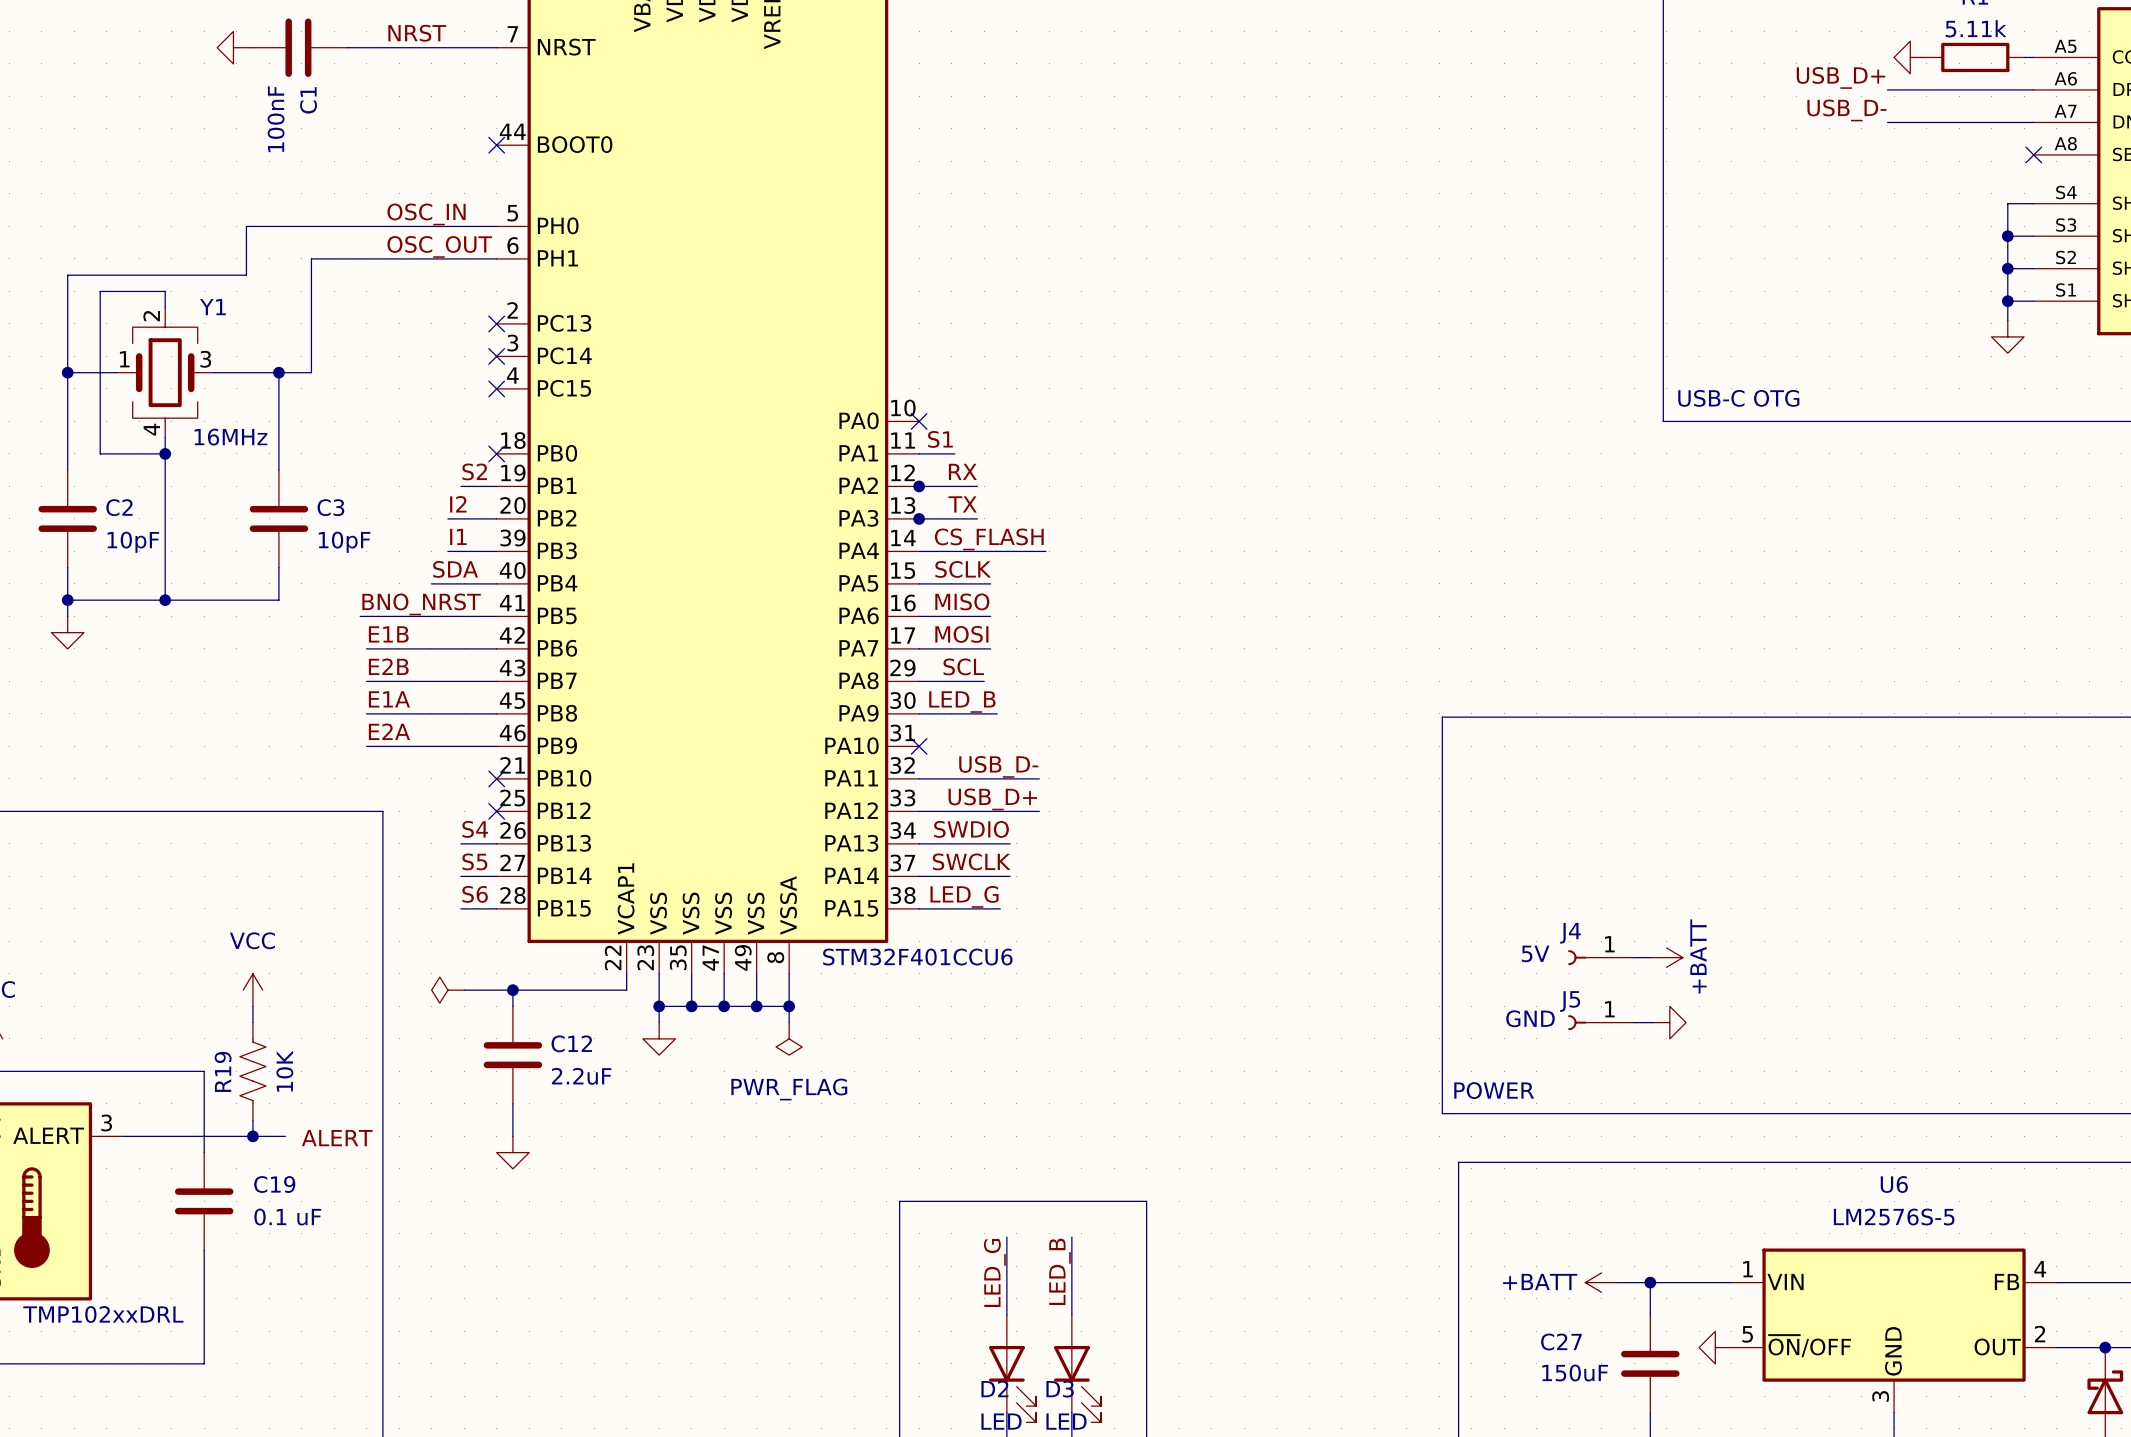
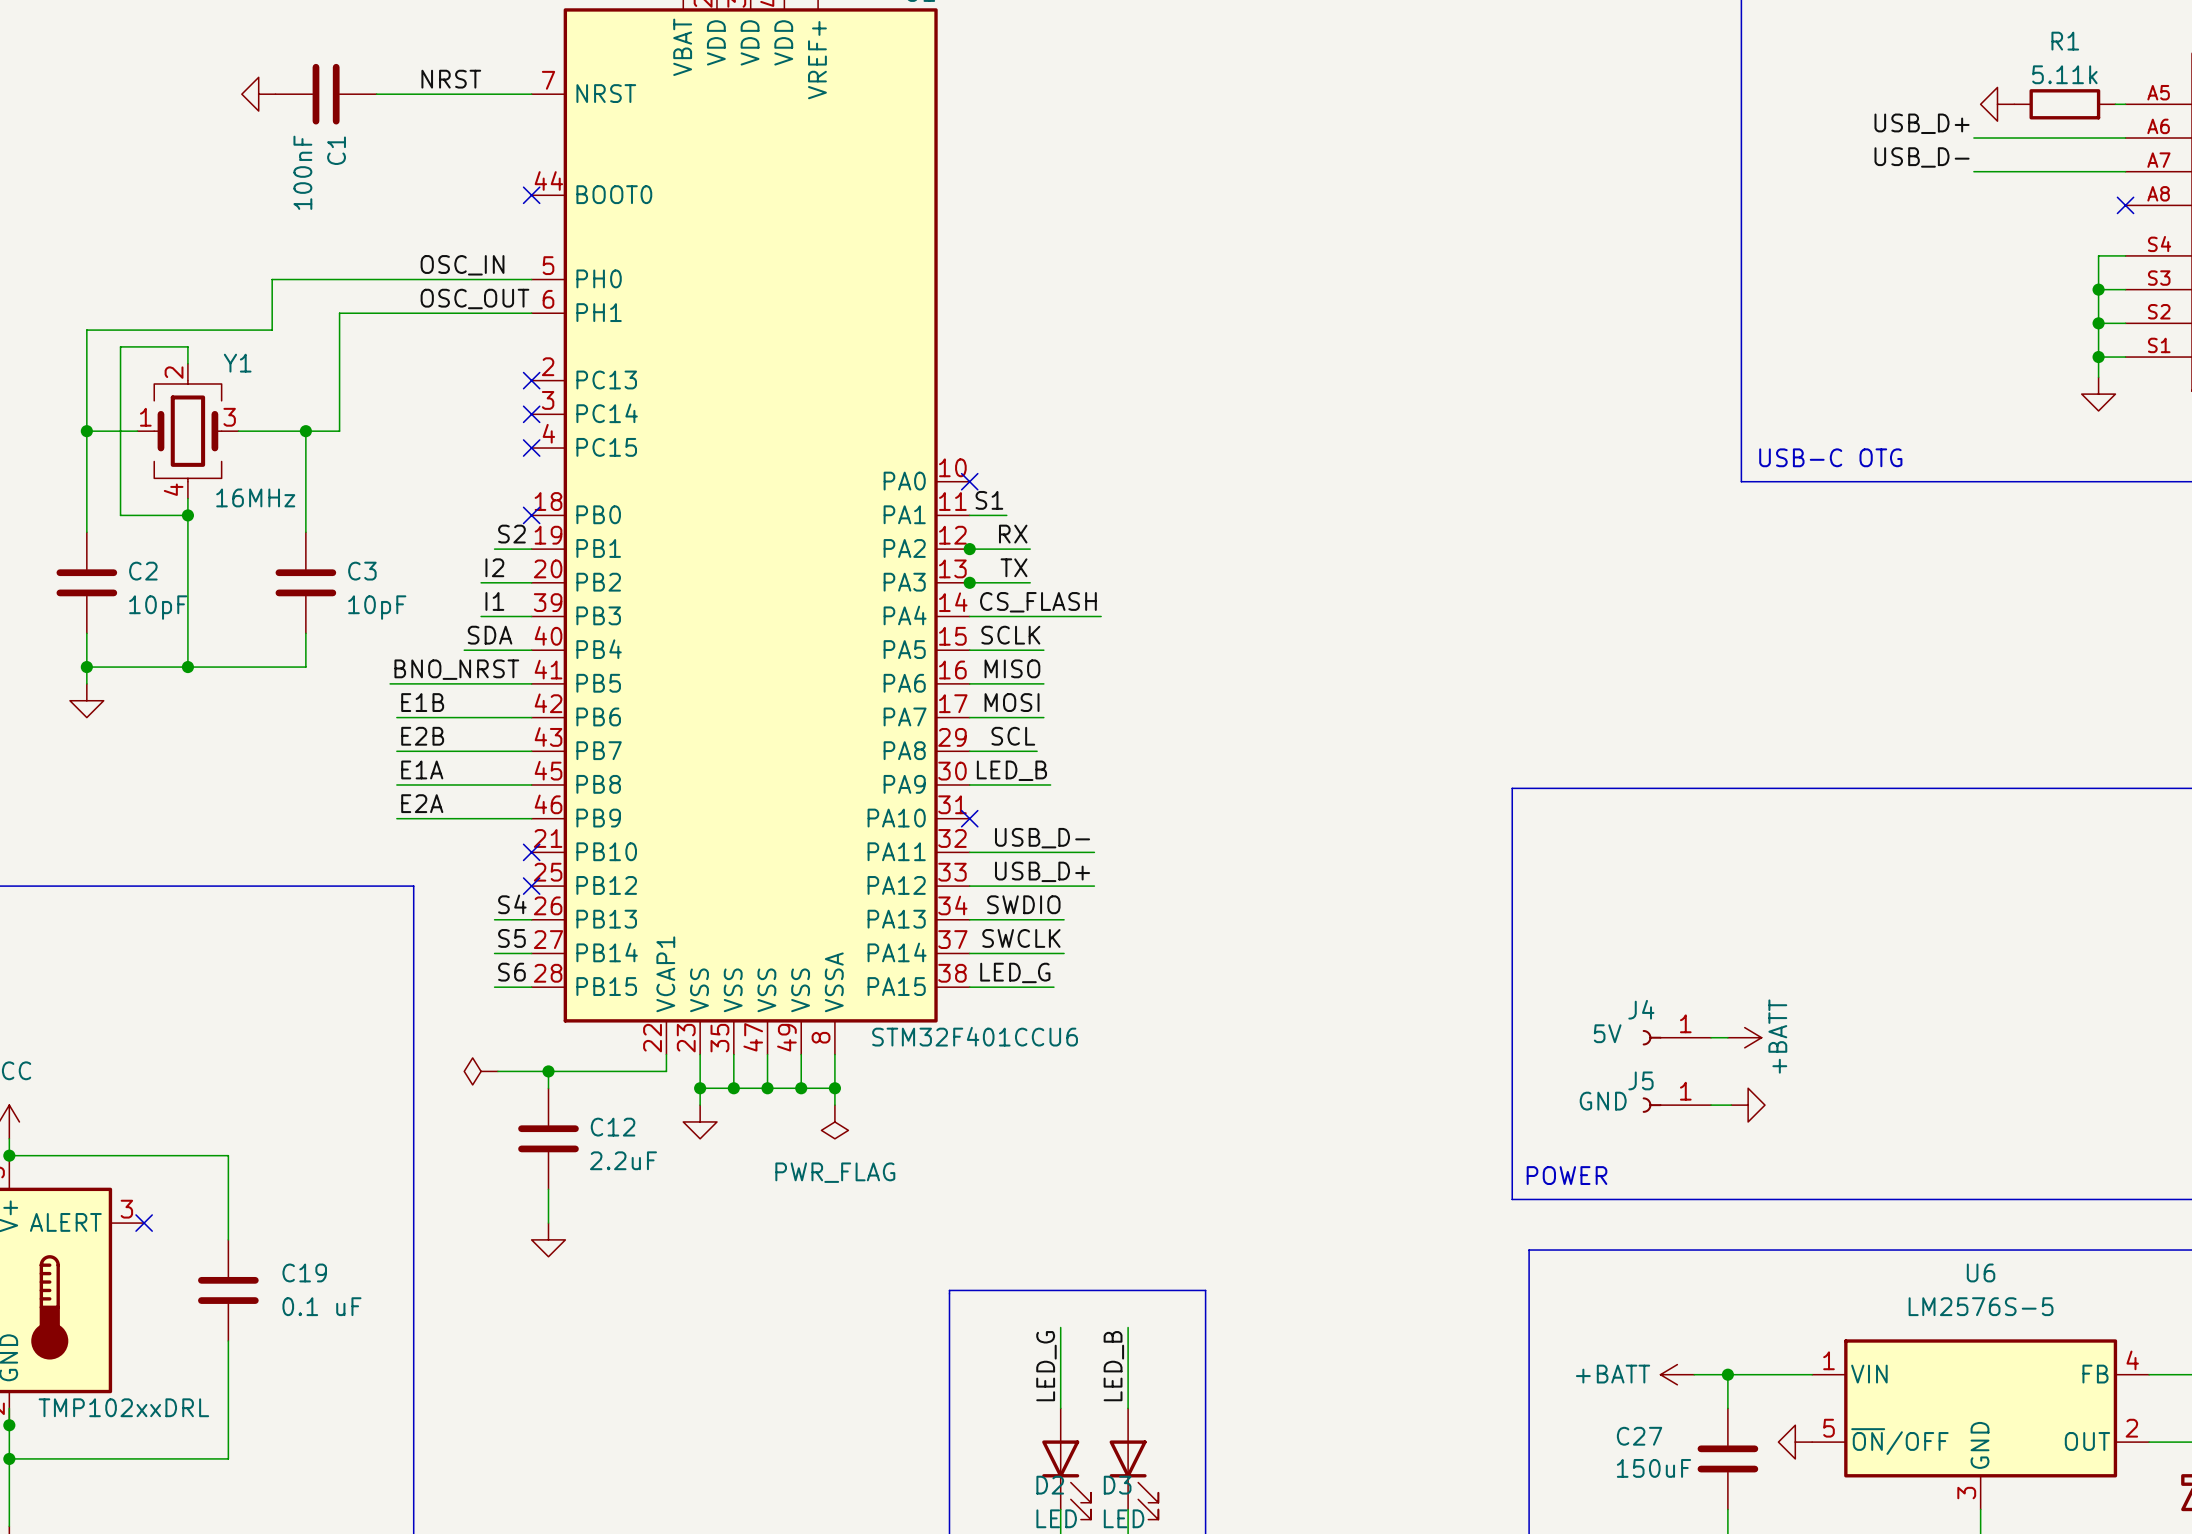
power symbol: VCC (252, 990) -> none
wire: (252, 1006) (252, 1022) -> none
R19: 10K (252, 1071) -> none
wire: (252, 1120) (252, 1136) -> none
wire: (122, 1136) (285, 1136) -> none
no-connect mark: none -> (144, 1223)
junction: (252, 1136) -> none
label: ALERT (337, 1138) -> none

